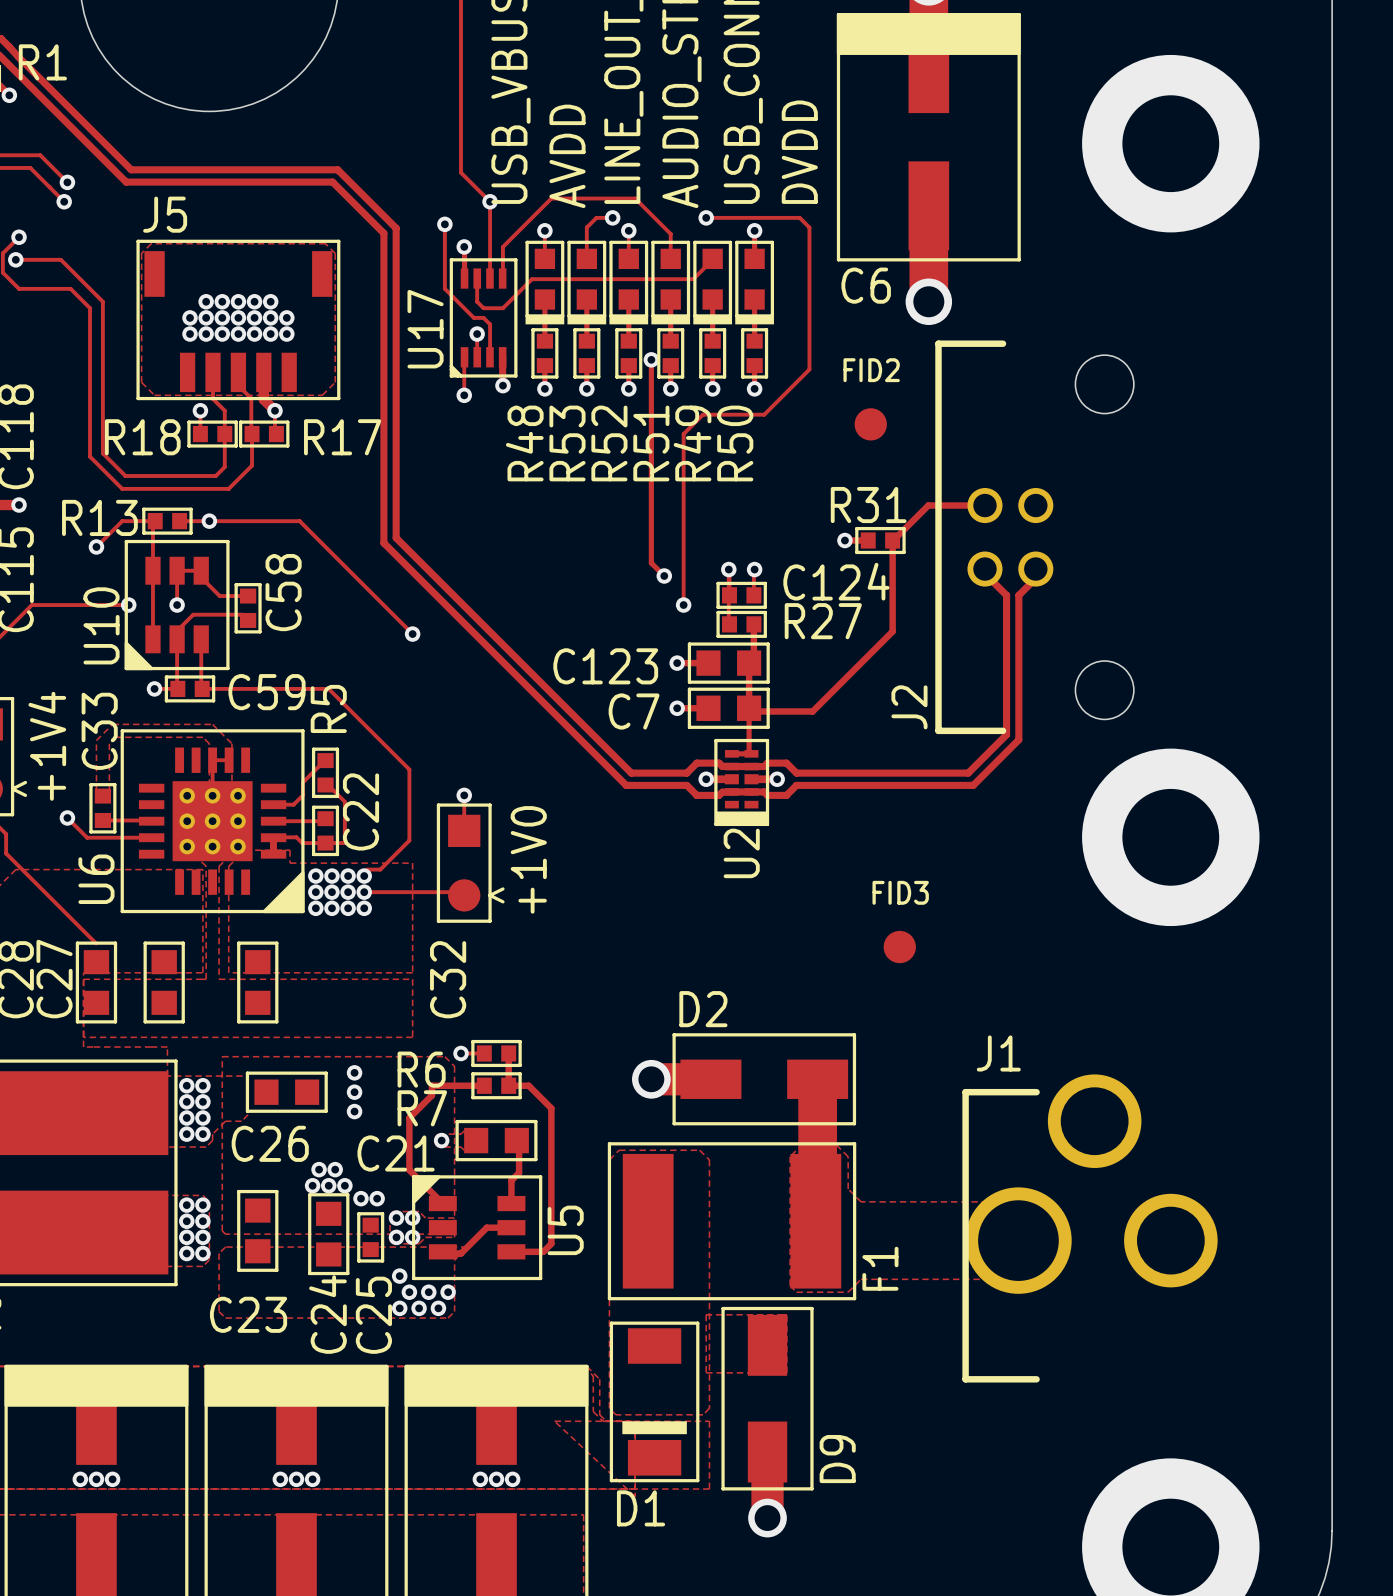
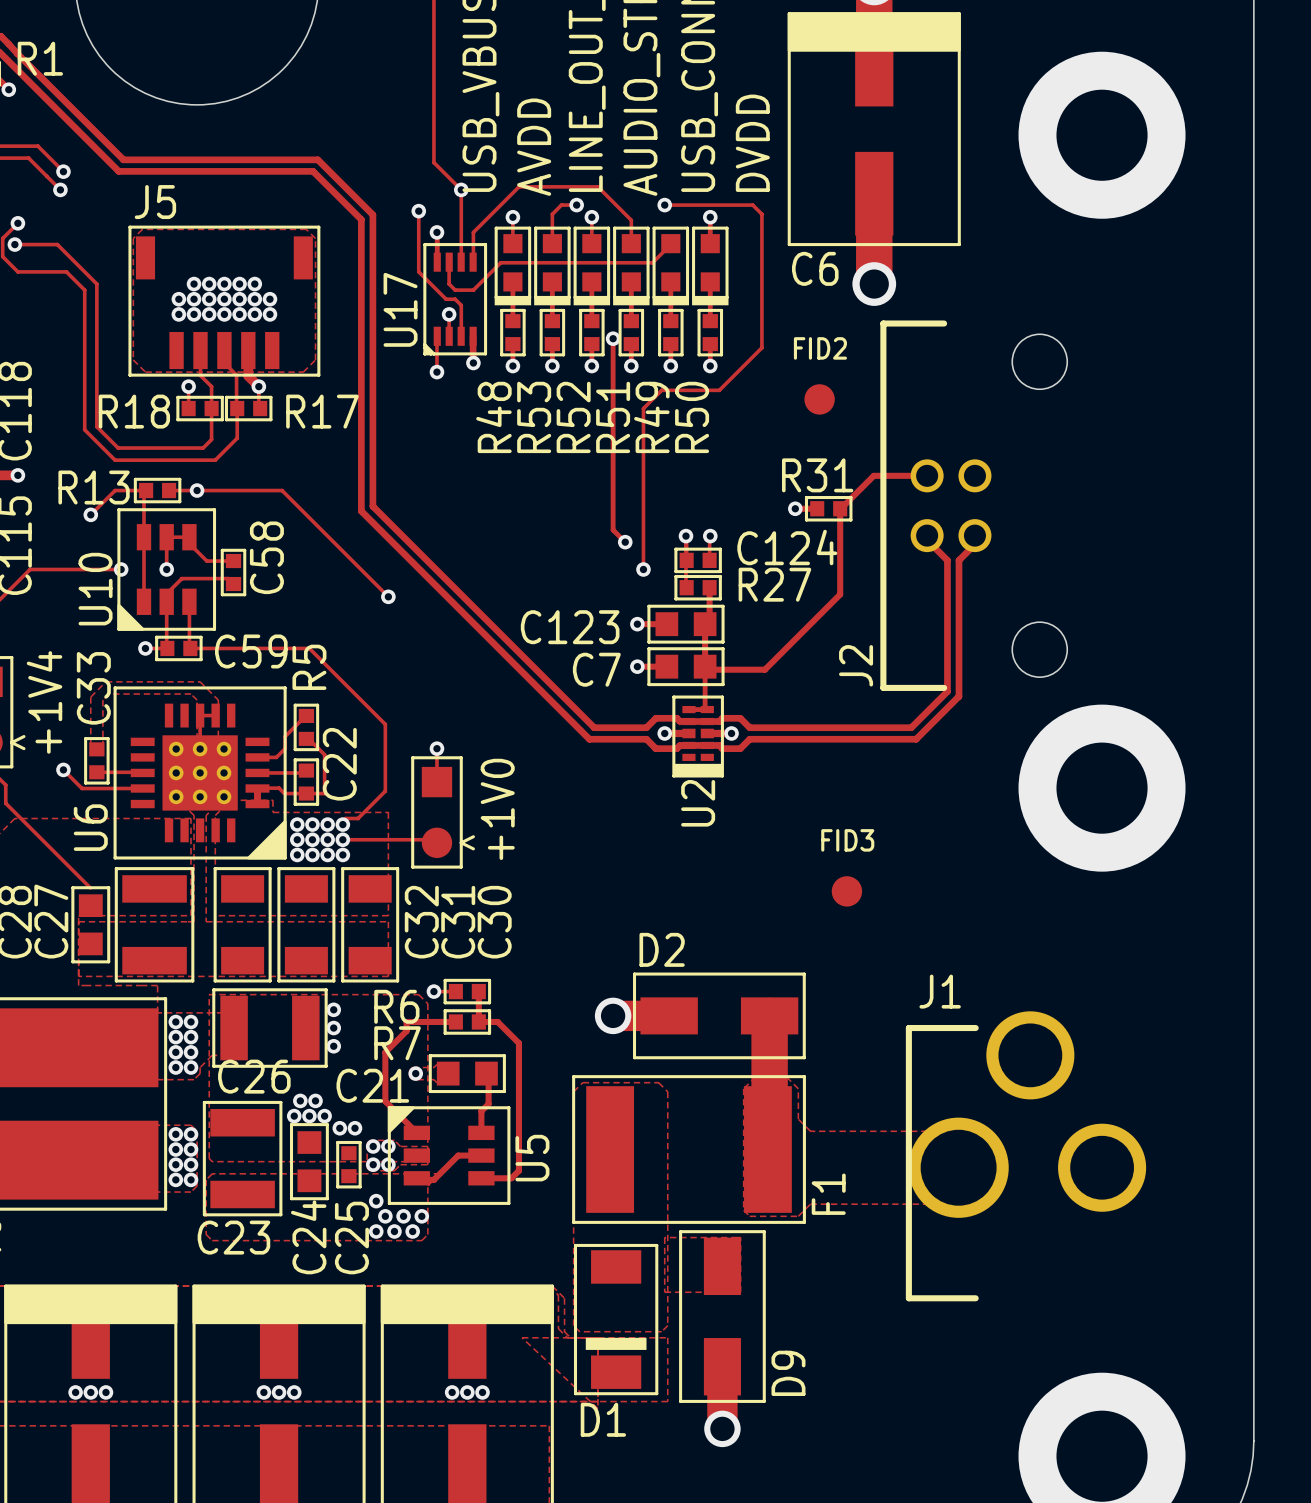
C27 footprint: [143, 941, 185, 1024] -> [114, 867, 195, 983]
C32 footprint: [237, 941, 279, 1024] -> [213, 867, 272, 983]
C31: none -> (306, 924)
C30: none -> (370, 924)
C26 footprint: [245, 1071, 328, 1113] -> [212, 988, 328, 1068]
C23 footprint: [237, 1189, 279, 1272] -> [202, 1100, 283, 1217]

